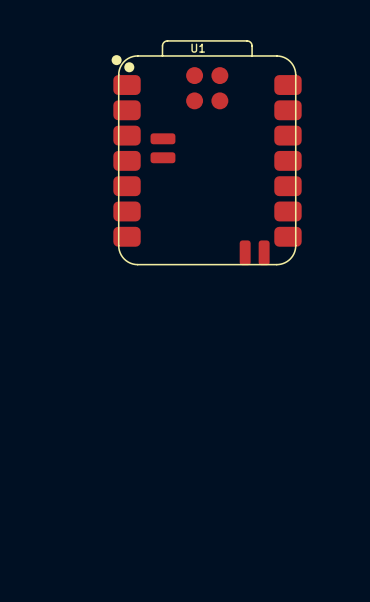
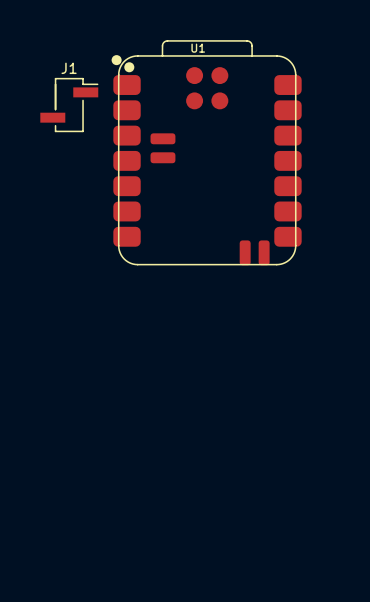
J1: none -> (69, 105)

